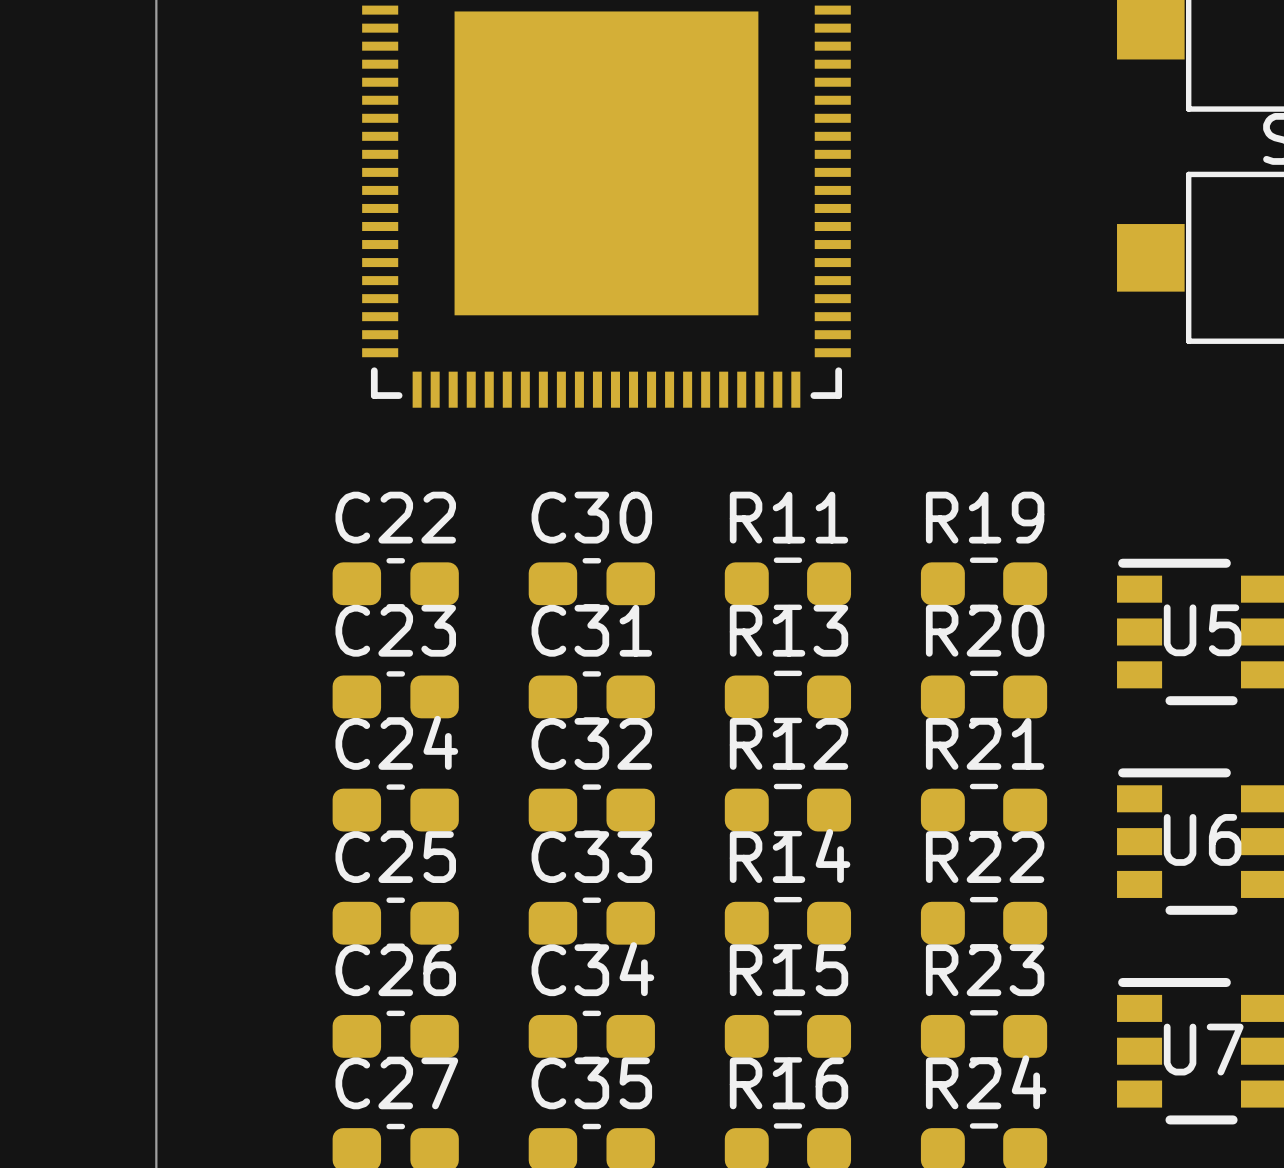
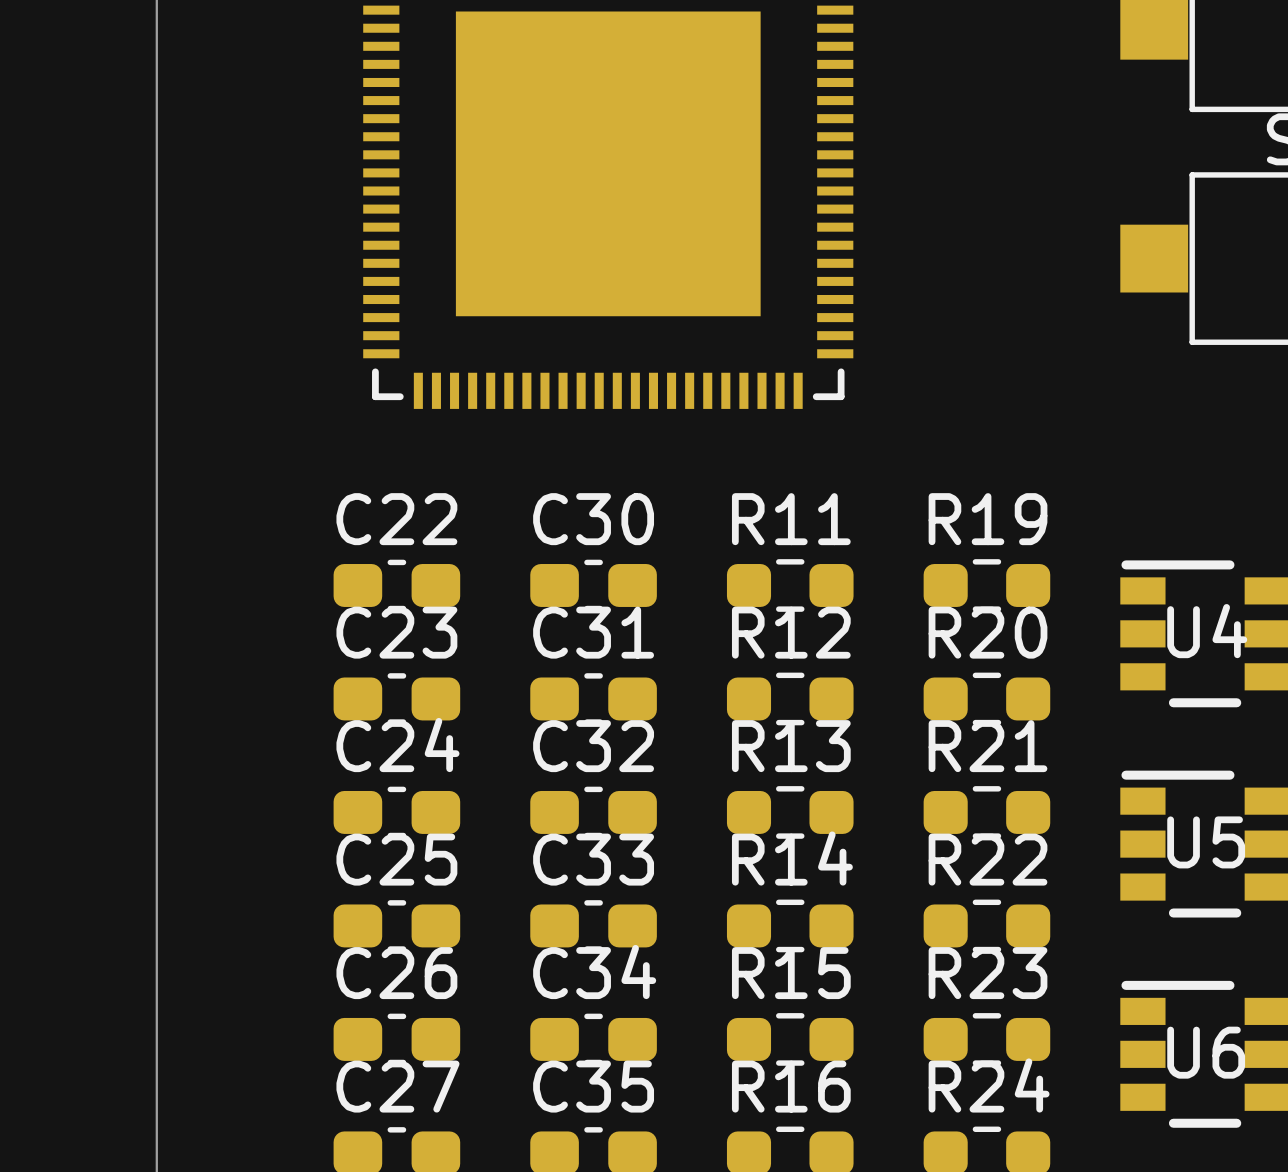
R13 name: R13 (789, 630) -> R12 (791, 632)
U5 name: U5 (1202, 630) -> U4 (1207, 631)
R12 name: R12 (789, 743) -> R13 (791, 746)
U6 name: U6 (1202, 839) -> U5 (1206, 842)
U7 name: U7 (1203, 1049) -> U6 (1206, 1052)

